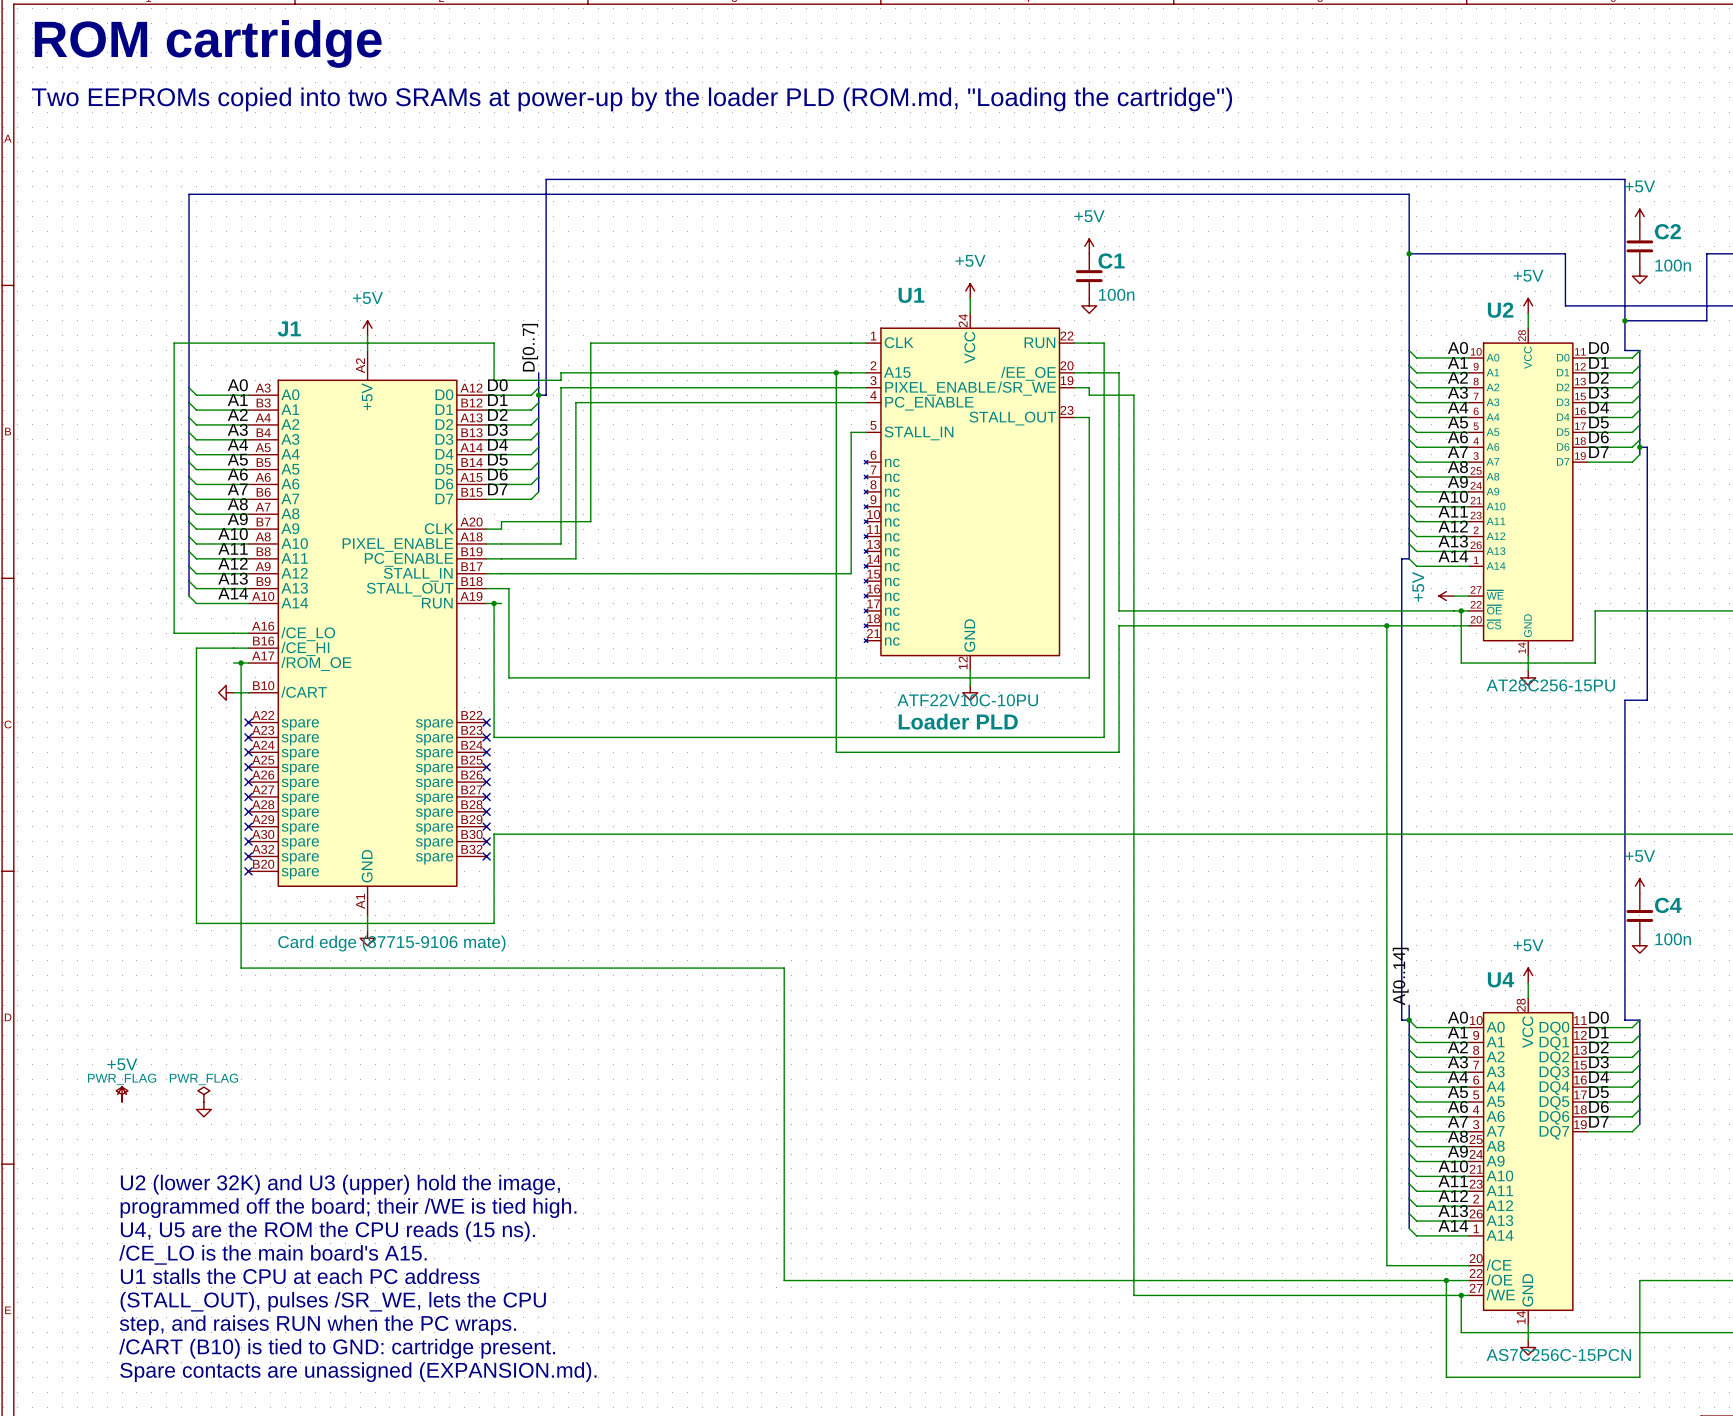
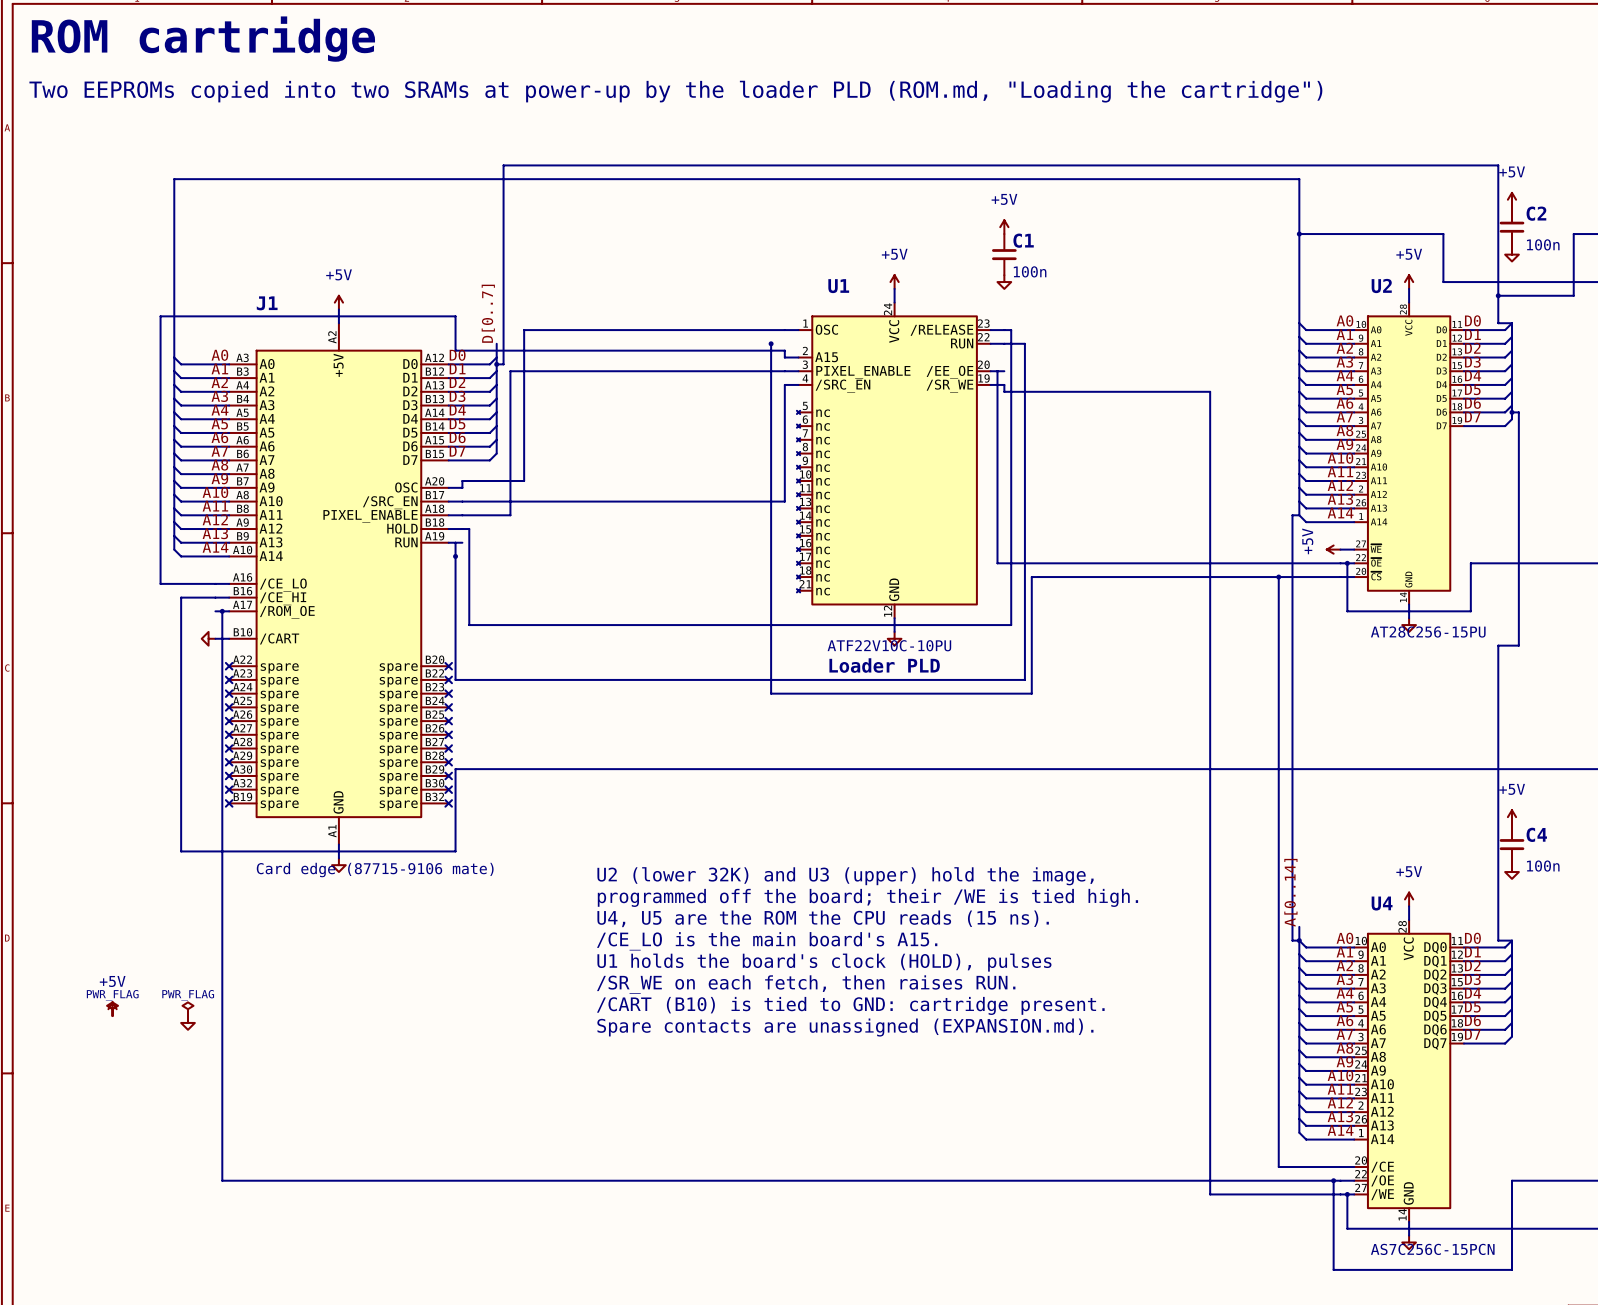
power symbol position: +5V (970, 291) -> +5V (894, 282)
U1 symbol: [864, 313, 1075, 671] -> [796, 302, 991, 619]
wire: (866, 343) (590, 343) (590, 521) (568, 521) -> (798, 330) (524, 330) (524, 480)
wire: (1074, 343) (1104, 343) (1104, 737) -> (1024, 343) (1024, 679) (1018, 679)
J1 symbol: [248, 350, 487, 916] -> [229, 323, 449, 845]
wire: (866, 372) (561, 372) (561, 380) -> (784, 357) (784, 350) (517, 350)
wire: (1111, 372) (1119, 372) (1119, 610) -> (997, 371) (997, 563) (1031, 563)
wire: (851, 387) (561, 387) (561, 543) -> none
wire: (1074, 387) (1089, 387) (1089, 395) (1133, 395) (1133, 1295) (1312, 1295) -> (1004, 391) (1210, 391) (1210, 1194)
wire: (575, 402) (575, 558) (553, 558) -> (531, 371) (510, 371) (510, 515)
wire: none -> (990, 371) (1004, 371)
wire: (1089, 424) (1089, 677) -> (990, 330) (1011, 330) (1011, 625) (1004, 625)
wire: (851, 432) (866, 432) -> (784, 398) (784, 384) (798, 384)
wire: (851, 543) (851, 573) (508, 573) -> (784, 501) (517, 501)
wire: none -> (455, 542) (455, 556)
wire: (501, 588) (508, 588) -> (469, 529) (469, 542)
wire: (486, 603) (501, 603) -> none
no-connect mark: none -> (448, 803)
text: none -> U2 (lower 32K) and U3 (upper) hold the image, (845, 876)
wire: (241, 968) (784, 968) (784, 1280) -> (222, 892) (222, 1180) (723, 1180)
text: none -> programmed off the board; their /WE is tied high. (867, 897)
text: none -> U4, U5 are the ROM the CPU reads (15 ns). (823, 918)
text: none -> /CE_LO is the main board's A15. (767, 941)
text: none -> U1 holds the board's clock (HOLD), pulses (824, 962)
text: none -> /SR_WE on each fetch, then raises RUN. (806, 984)
text: none -> /CART (B10) is tied to GND: cartridge present. (850, 1005)
text: none -> Spare contacts are unassigned (EXPANSION.md). (845, 1027)
text: U2 (lower 32K) and U3 (upper) hold the image, (340, 1184) -> none
text: programmed off the board; their /WE is tied high. (348, 1208) -> none
text: U4, U5 are the ROM the CPU reads (15 ns). (327, 1231) -> none
text: /CE_LO is the main board's A15. (272, 1254) -> none
text: U1 stalls the CPU at each PC address (300, 1276) -> none
text: (STALL_OUT), pulses /SR_WE, lets the CPU (333, 1301) -> none
text: step, and raises RUN when the PC wraps. (317, 1325) -> none
text: /CART (B10) is tied to GND: cartridge present. (337, 1348) -> none
text: Spare contacts are unassigned (EXPANSION.md). (358, 1372) -> none

